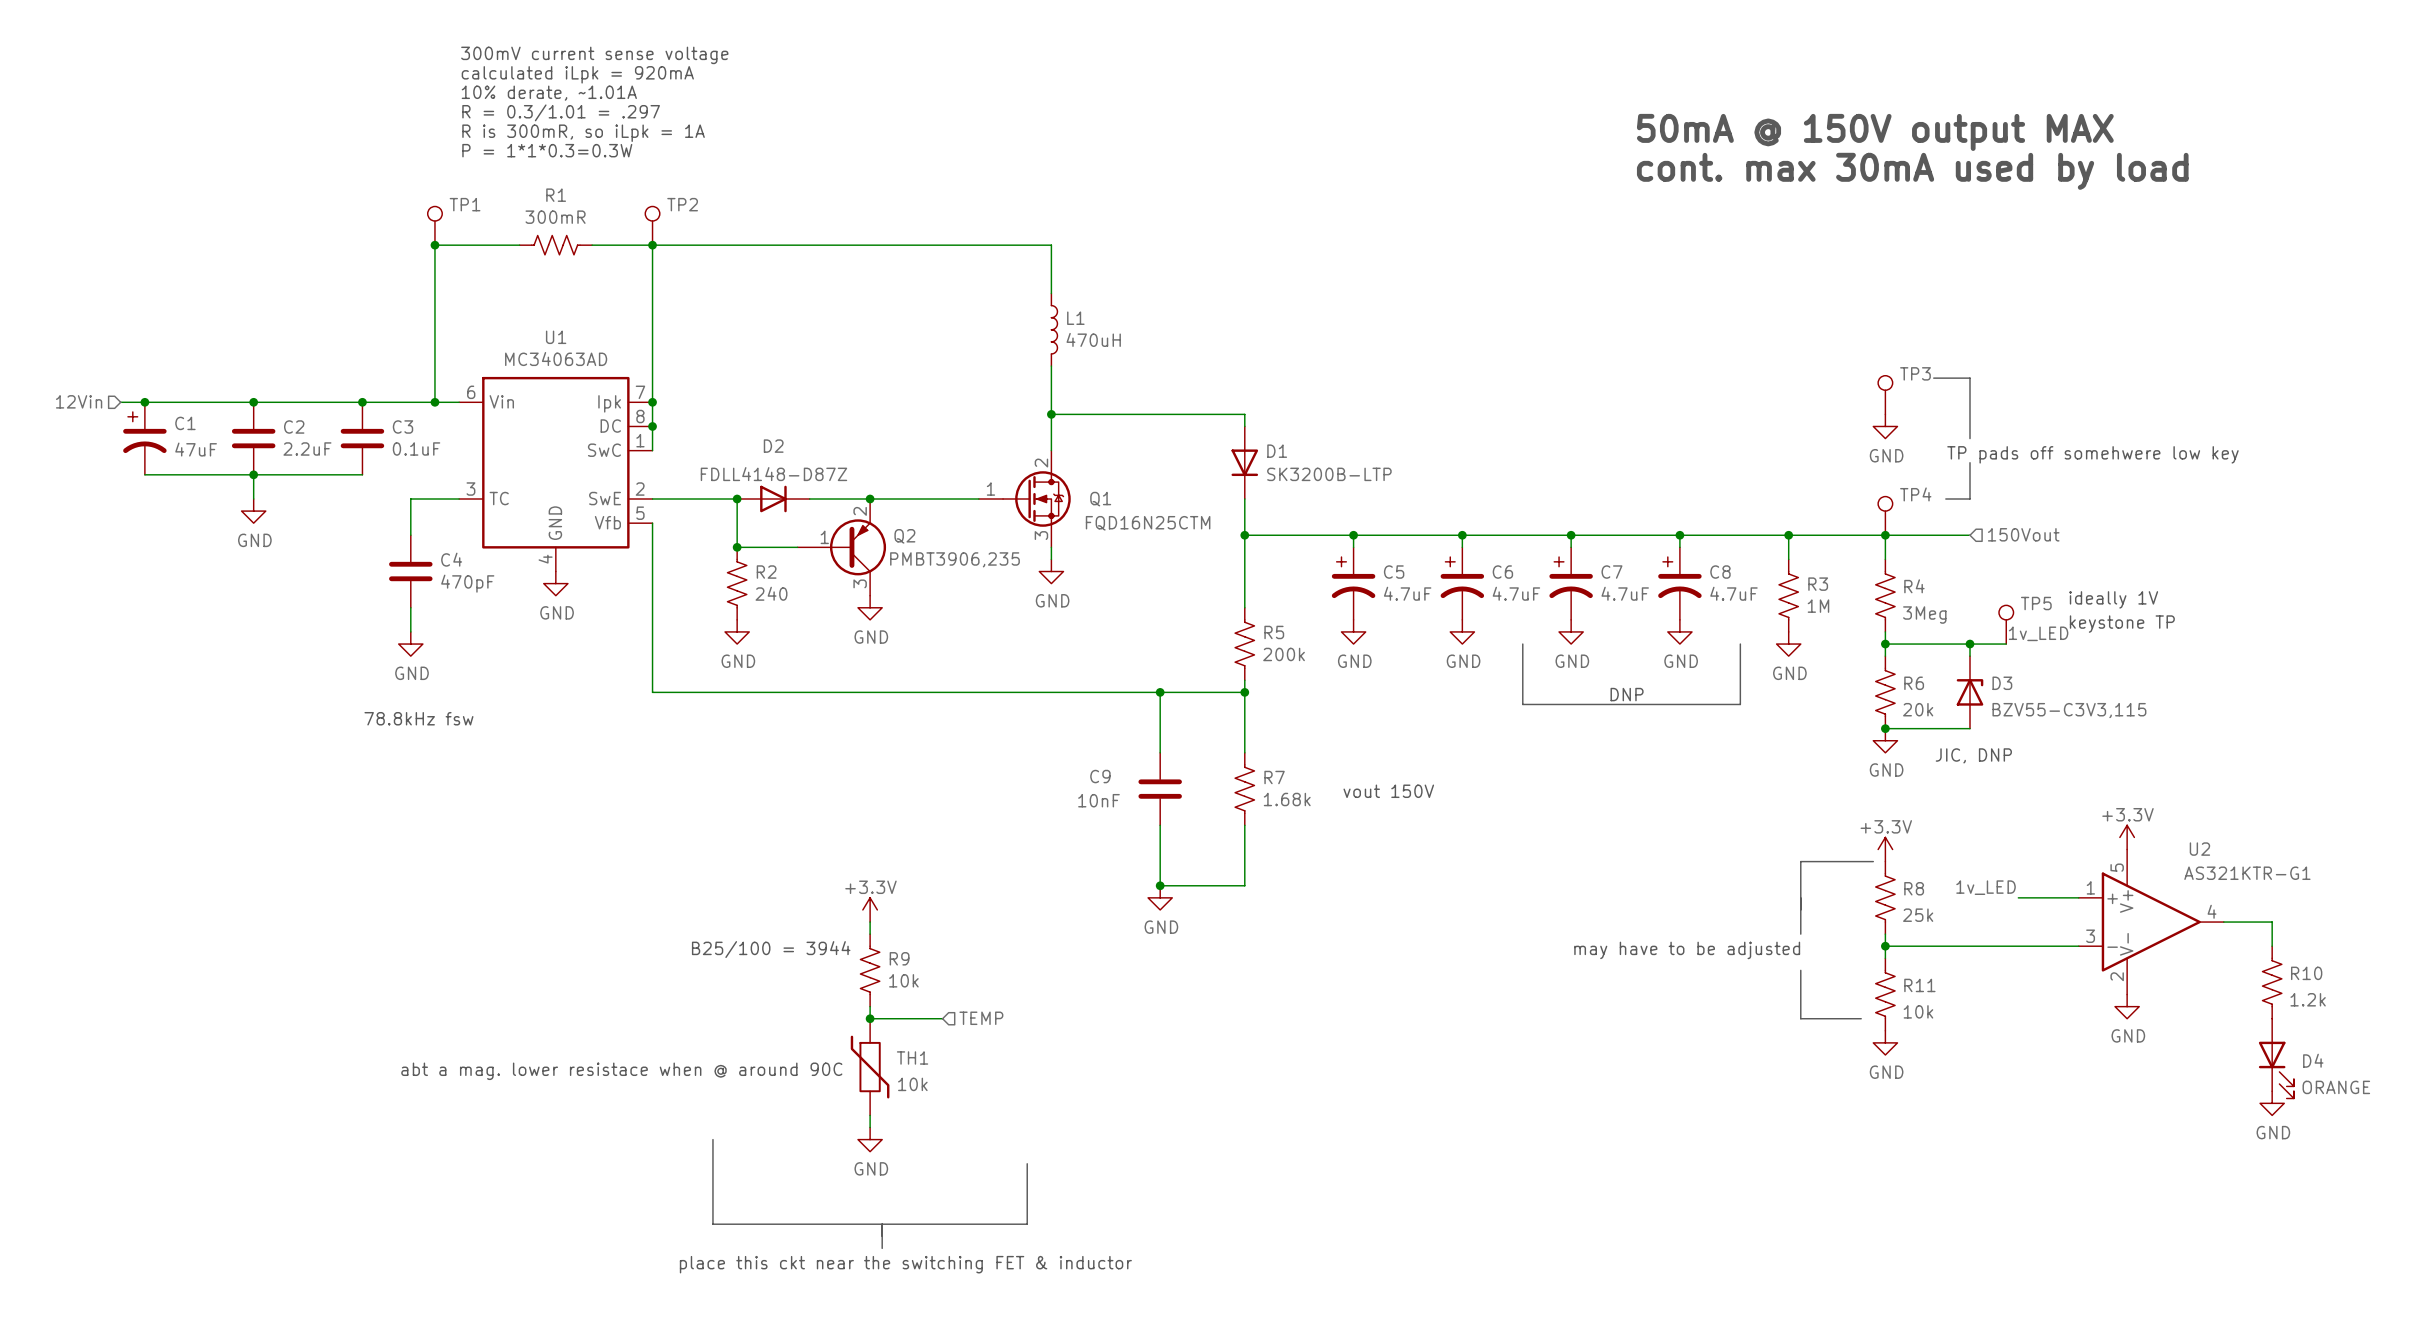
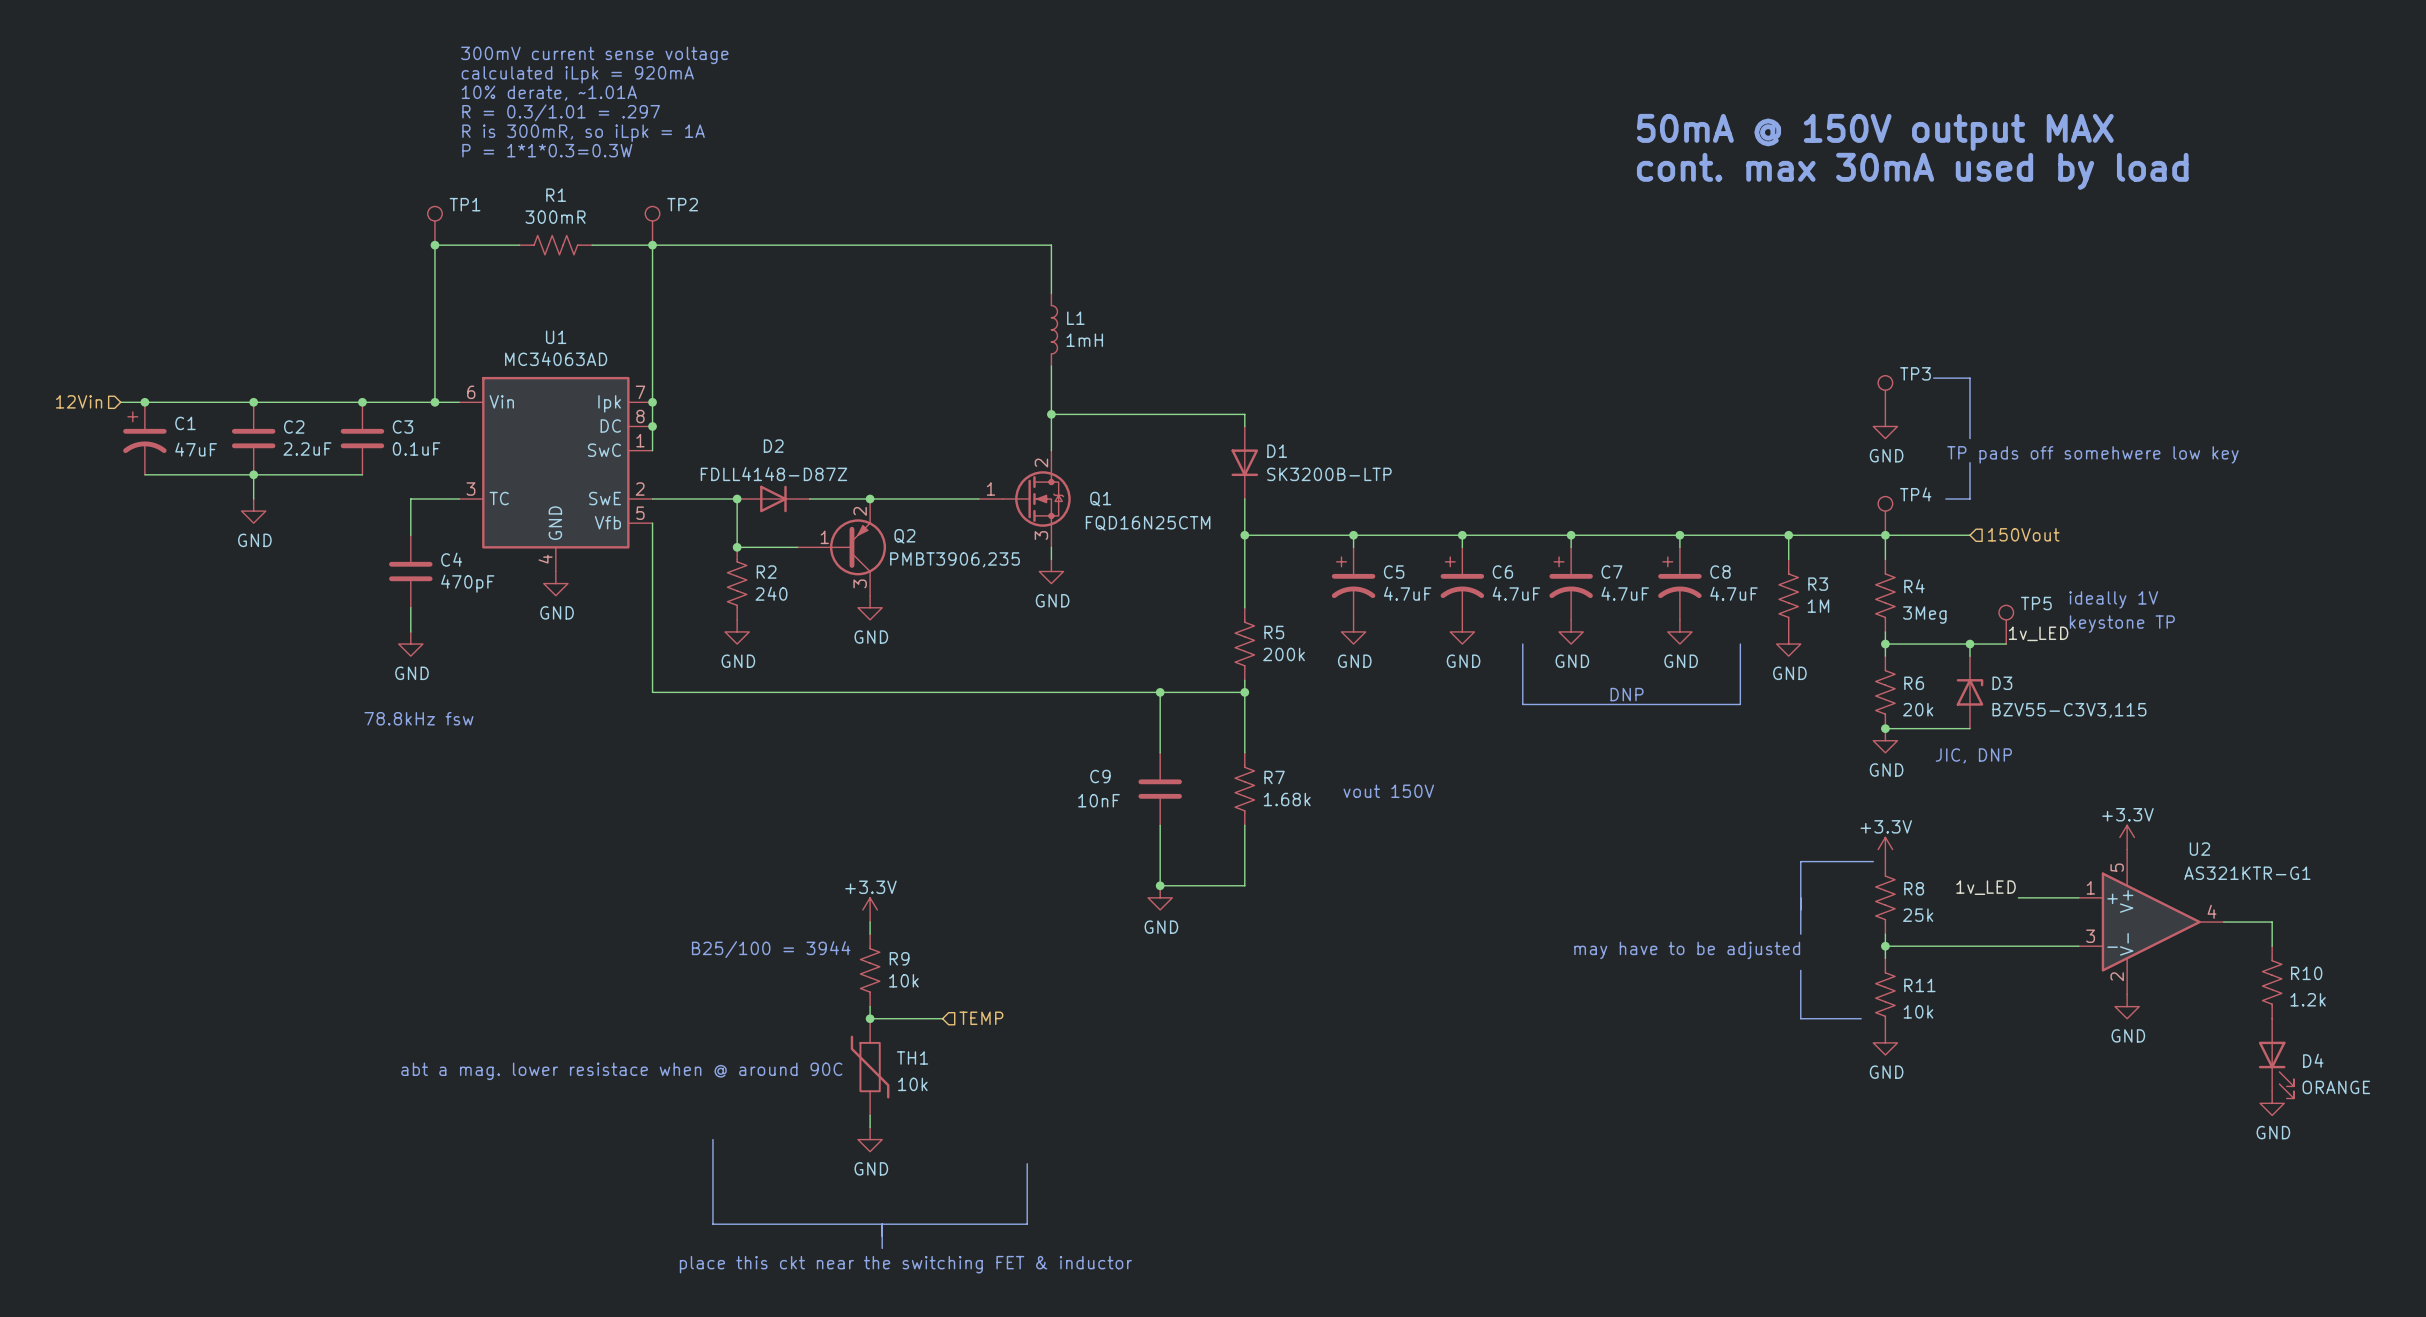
L1 value: 470uH (1093, 339) -> 1mH (1084, 340)

